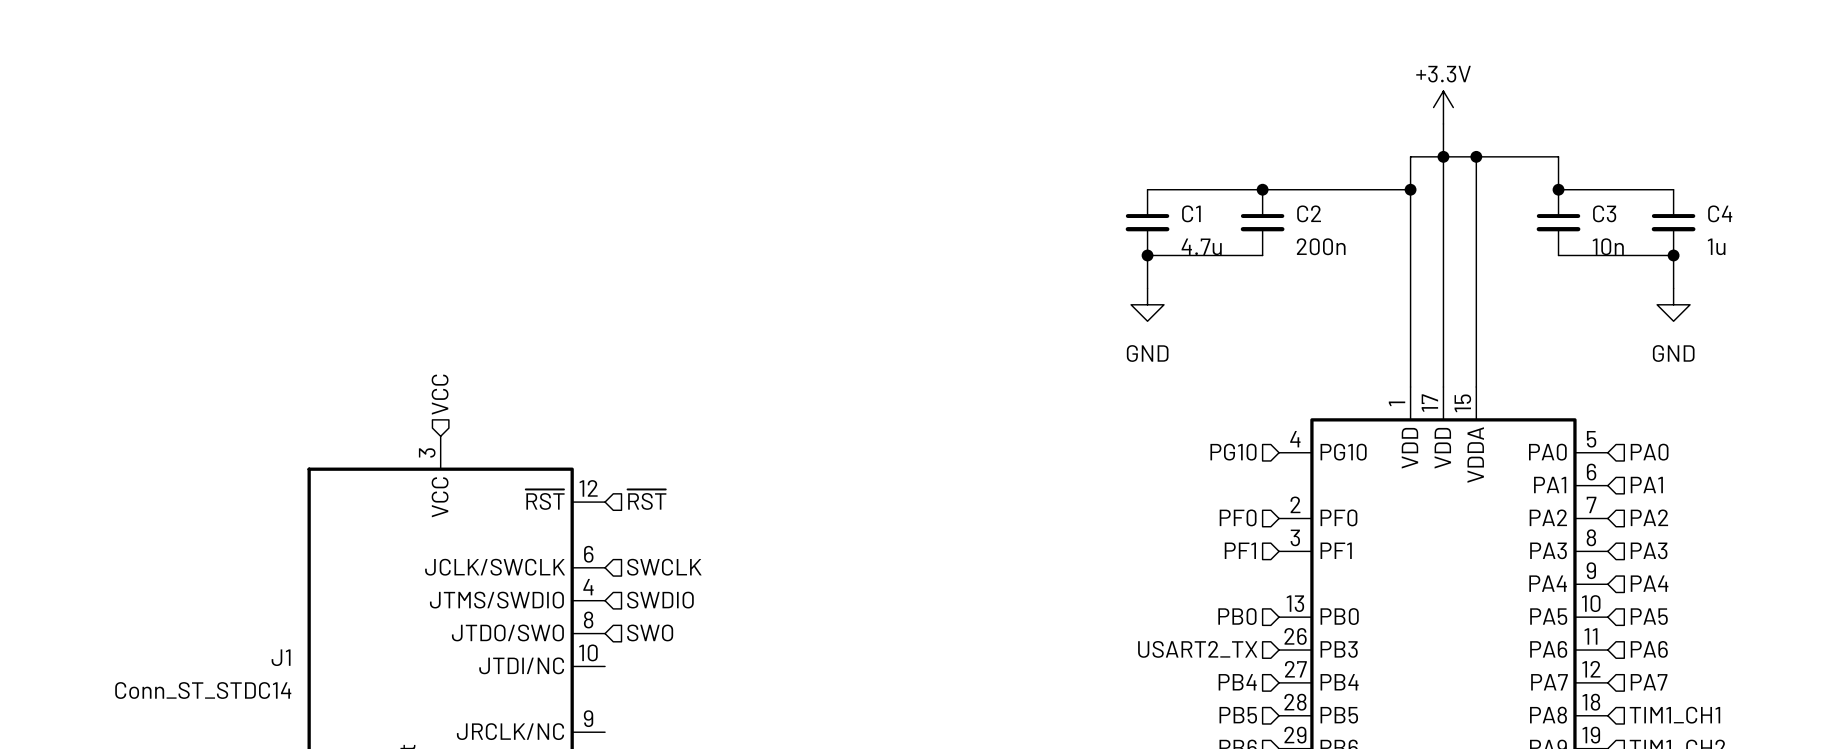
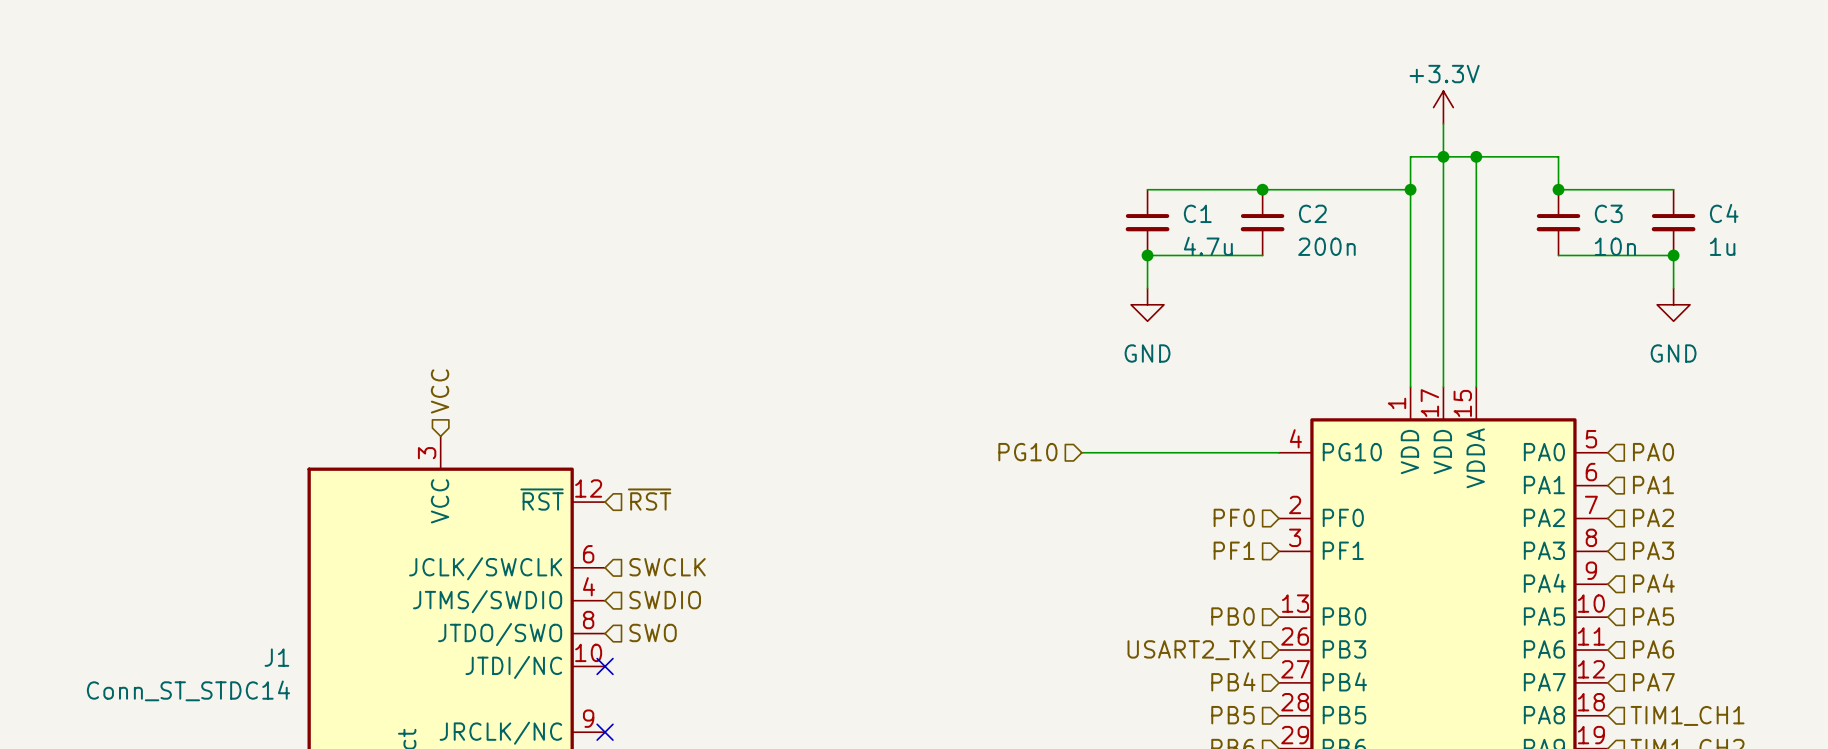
wire: none -> (1081, 452) (1279, 452)
hierarchical label position: PG10 (1233, 452) -> PG10 (1027, 452)
no-connect mark: none -> (605, 666)
no-connect mark: none -> (605, 732)

